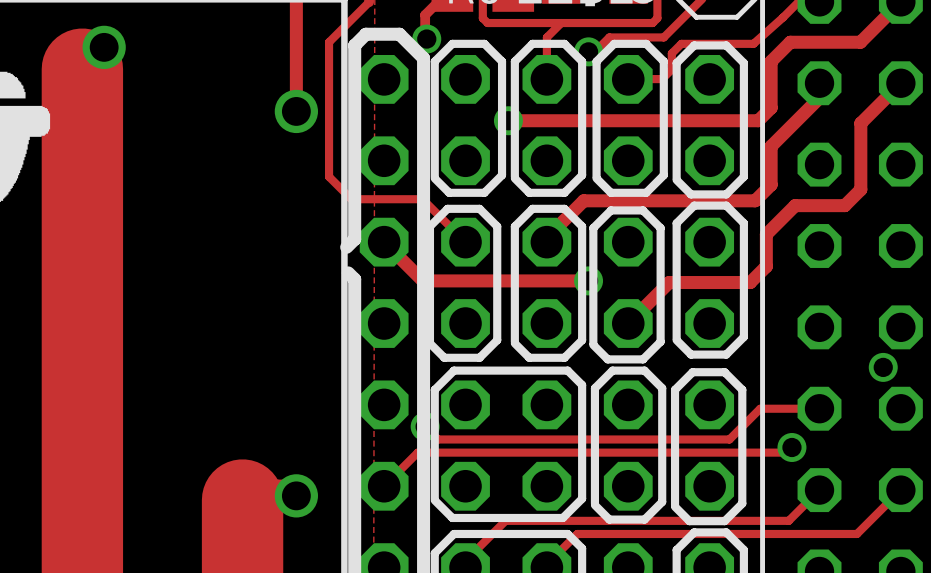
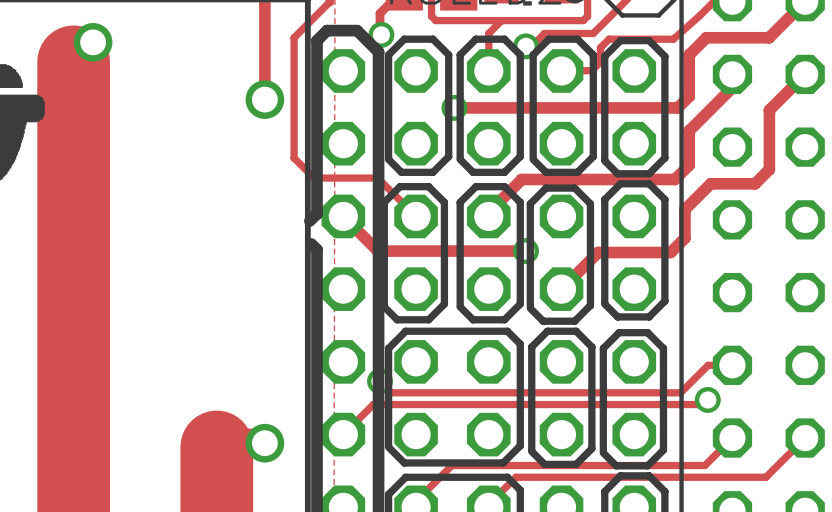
via: (883, 367) -> none
track: (792, 408) (760, 408) (729, 439) -> (708, 365) (680, 392) (652, 392)

